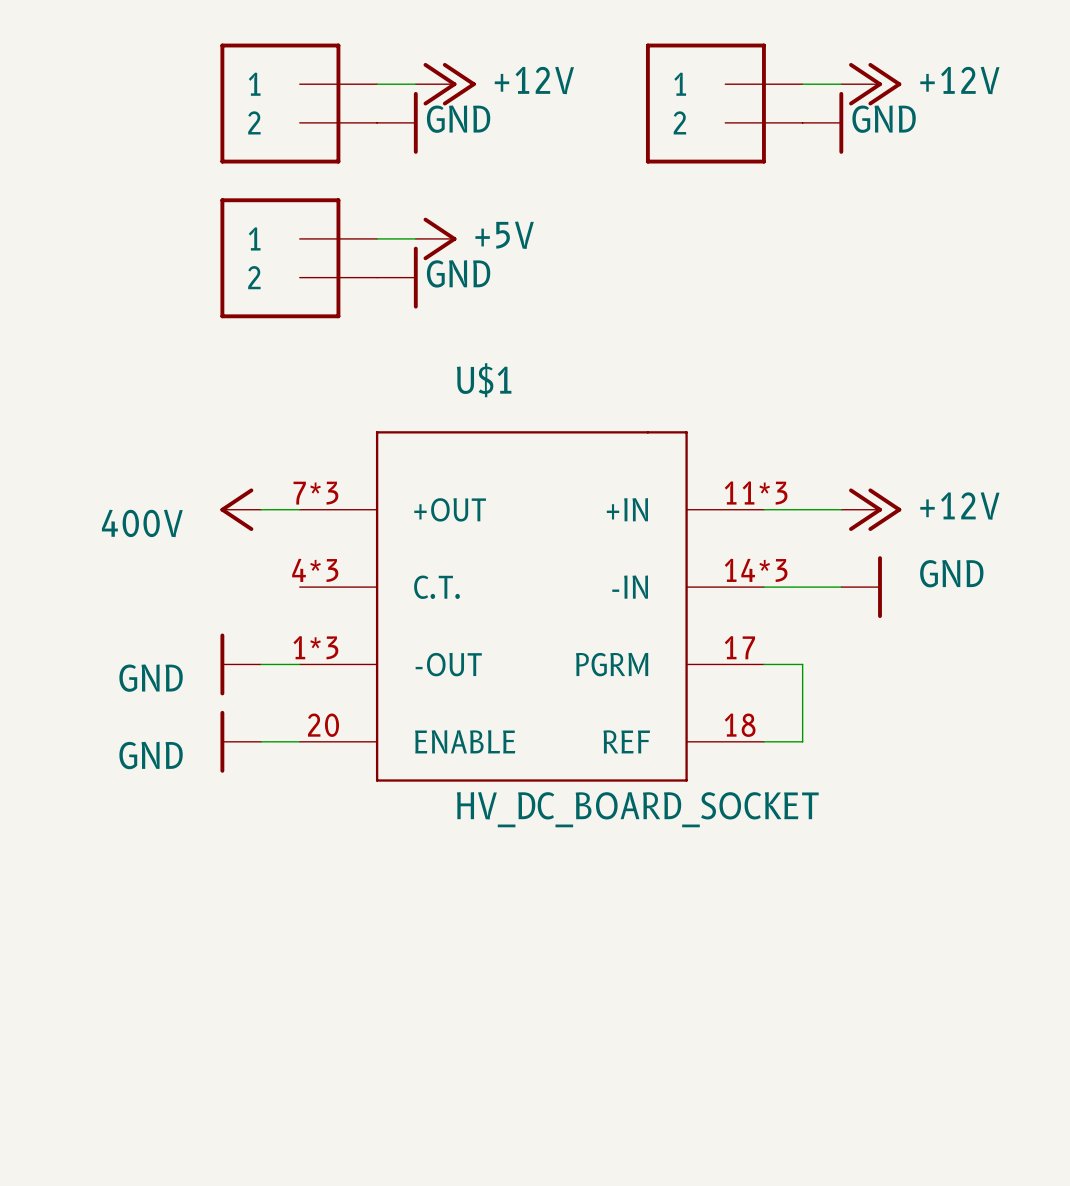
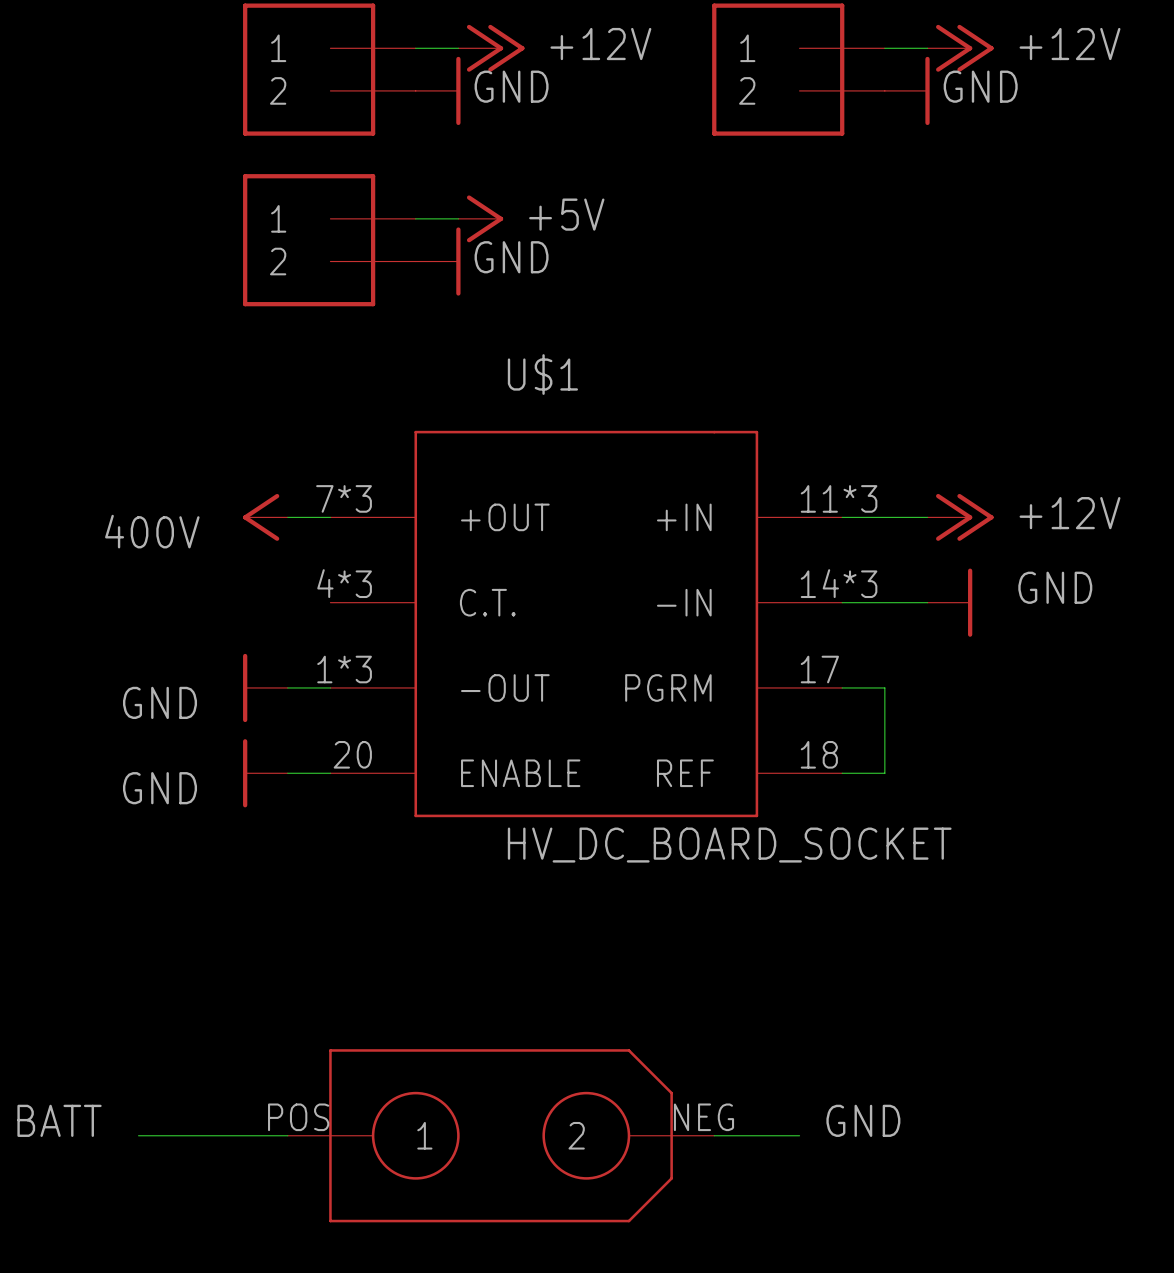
label: none -> BATT (59, 1120)
label: none -> GND (863, 1120)
wire: none -> (138, 1135) (287, 1135)
part: none -> (501, 1135)
wire: none -> (714, 1135) (799, 1135)

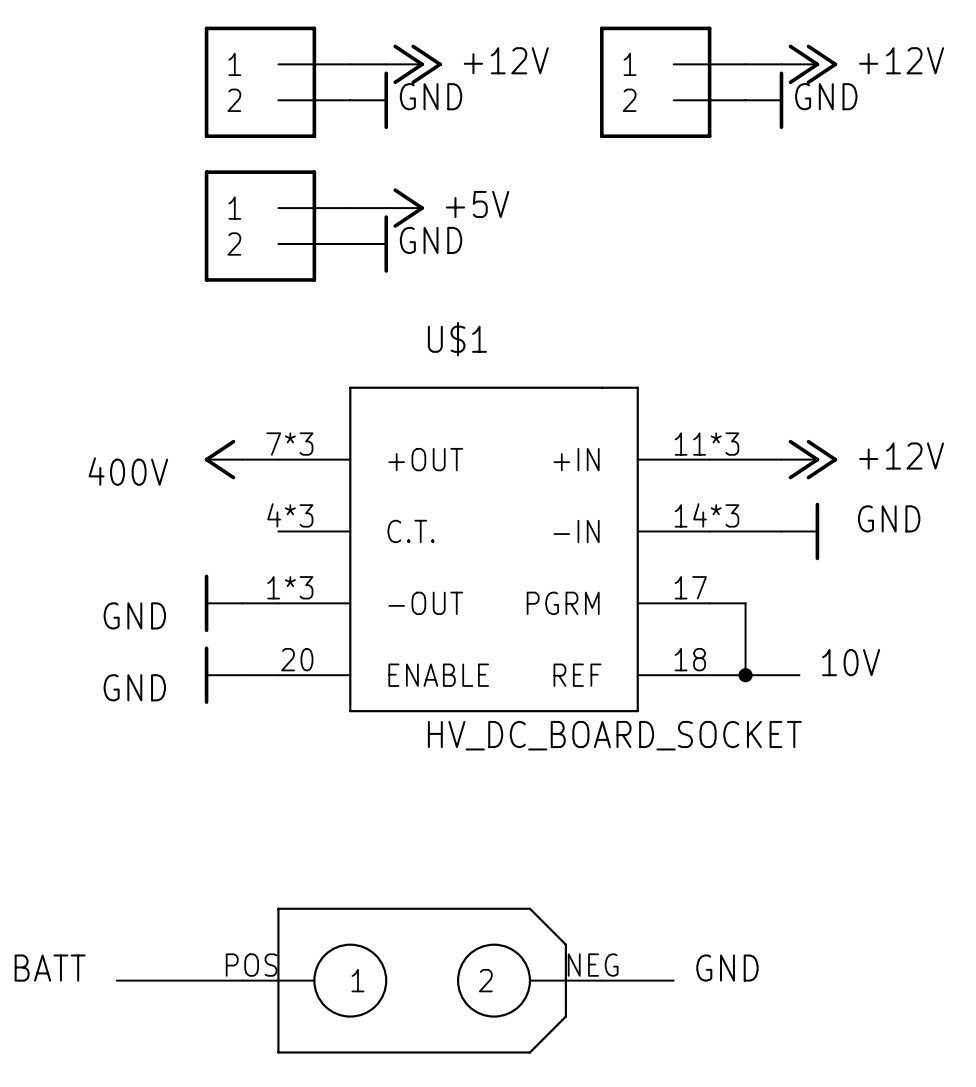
label: none -> 10V (851, 662)
wire: none -> (745, 675) (799, 675)
junction: none -> (745, 675)

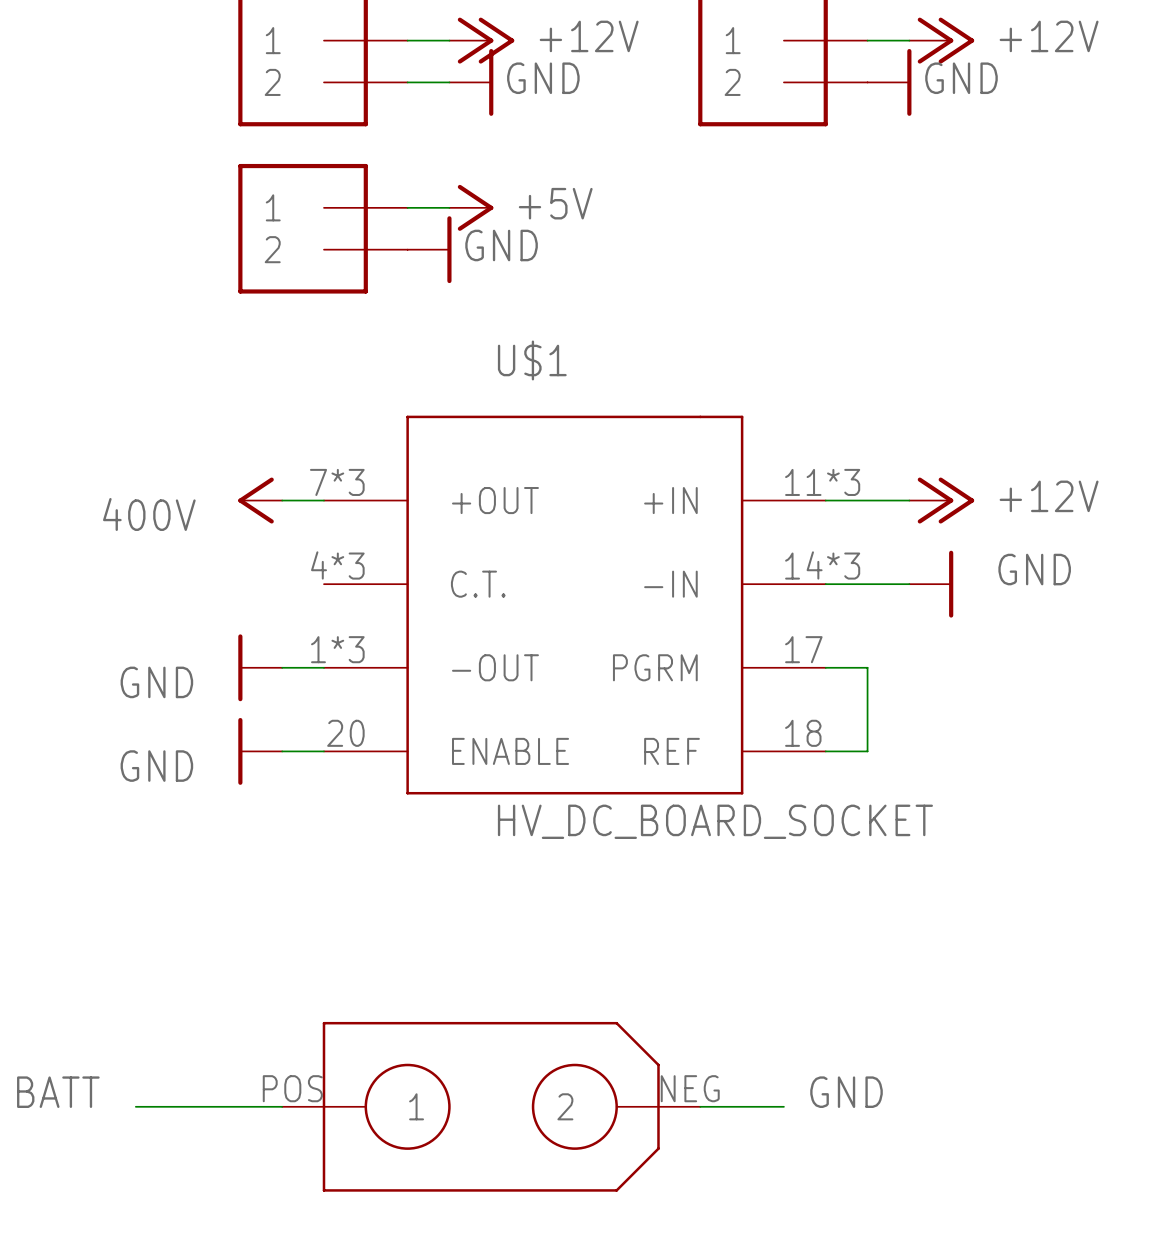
power symbol position: GND (369, 100) -> GND (471, 82)
label: 10V (851, 662) -> none
wire: (745, 675) (799, 675) -> none
junction: (745, 675) -> none

